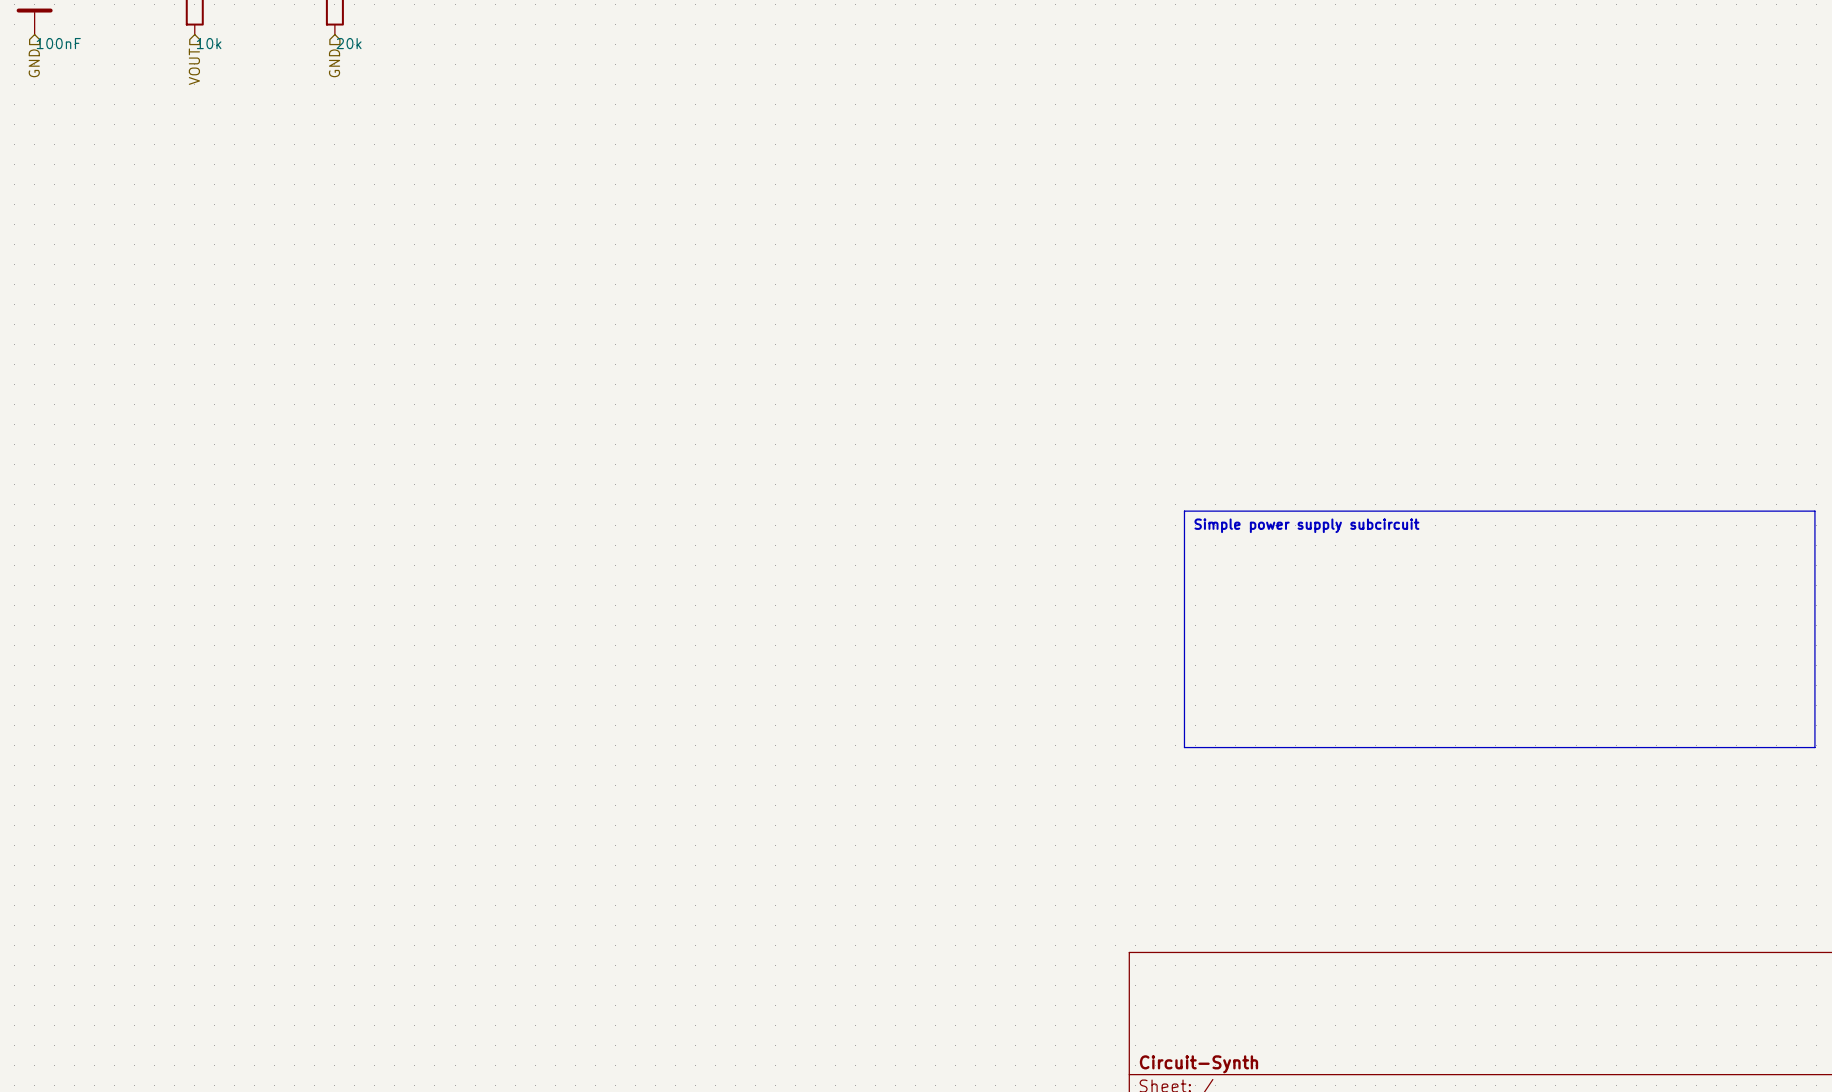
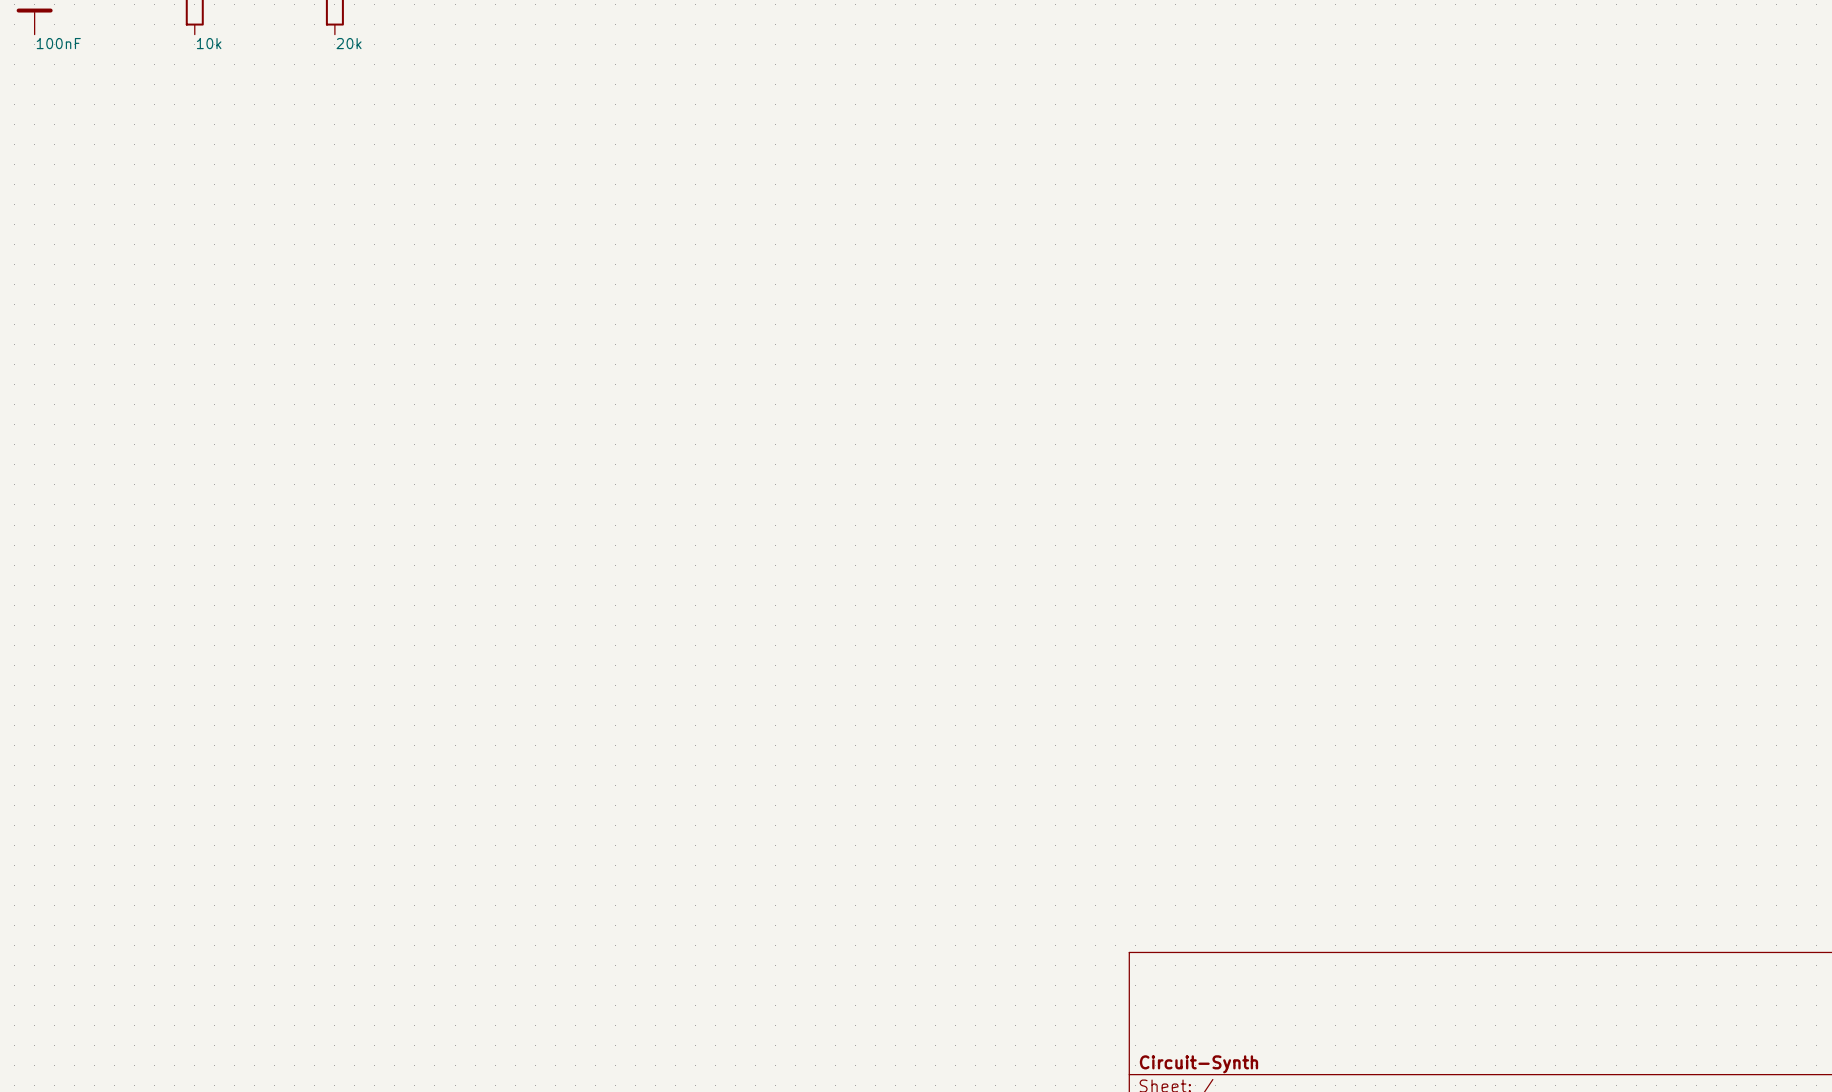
hierarchical label: GND (34, 63) -> none
hierarchical label: GND (334, 63) -> none
hierarchical label: VOUT (194, 66) -> none
line: (1184, 511) (1814, 511) (1814, 747) (1184, 747) (1184, 511) -> none
text: Simple power supply subcircuit (1306, 525) -> none

